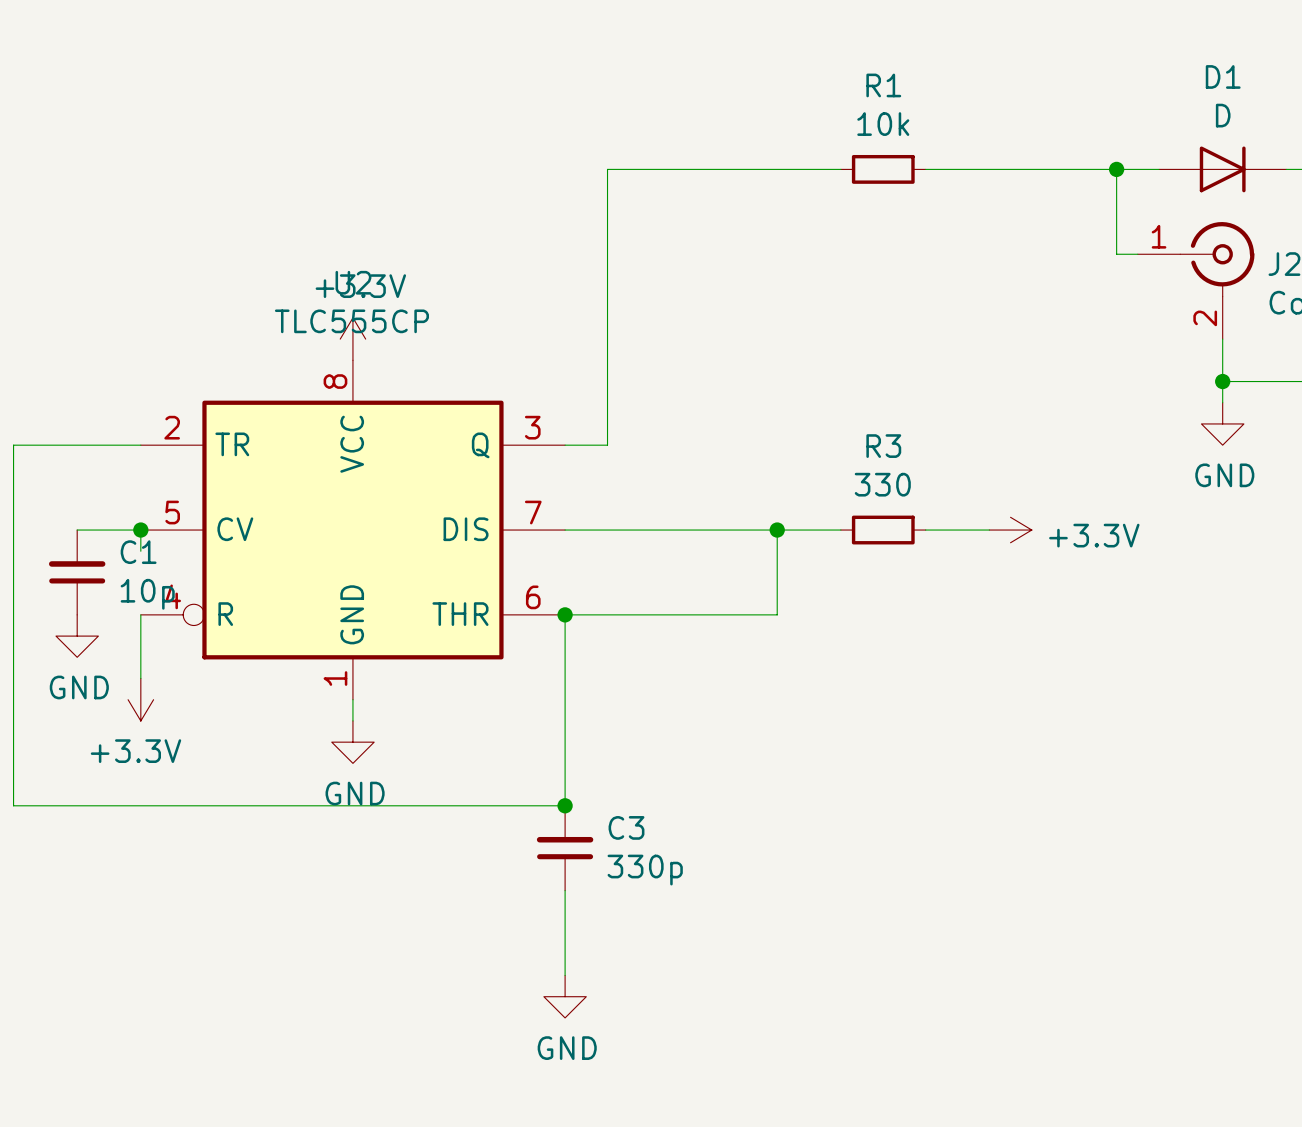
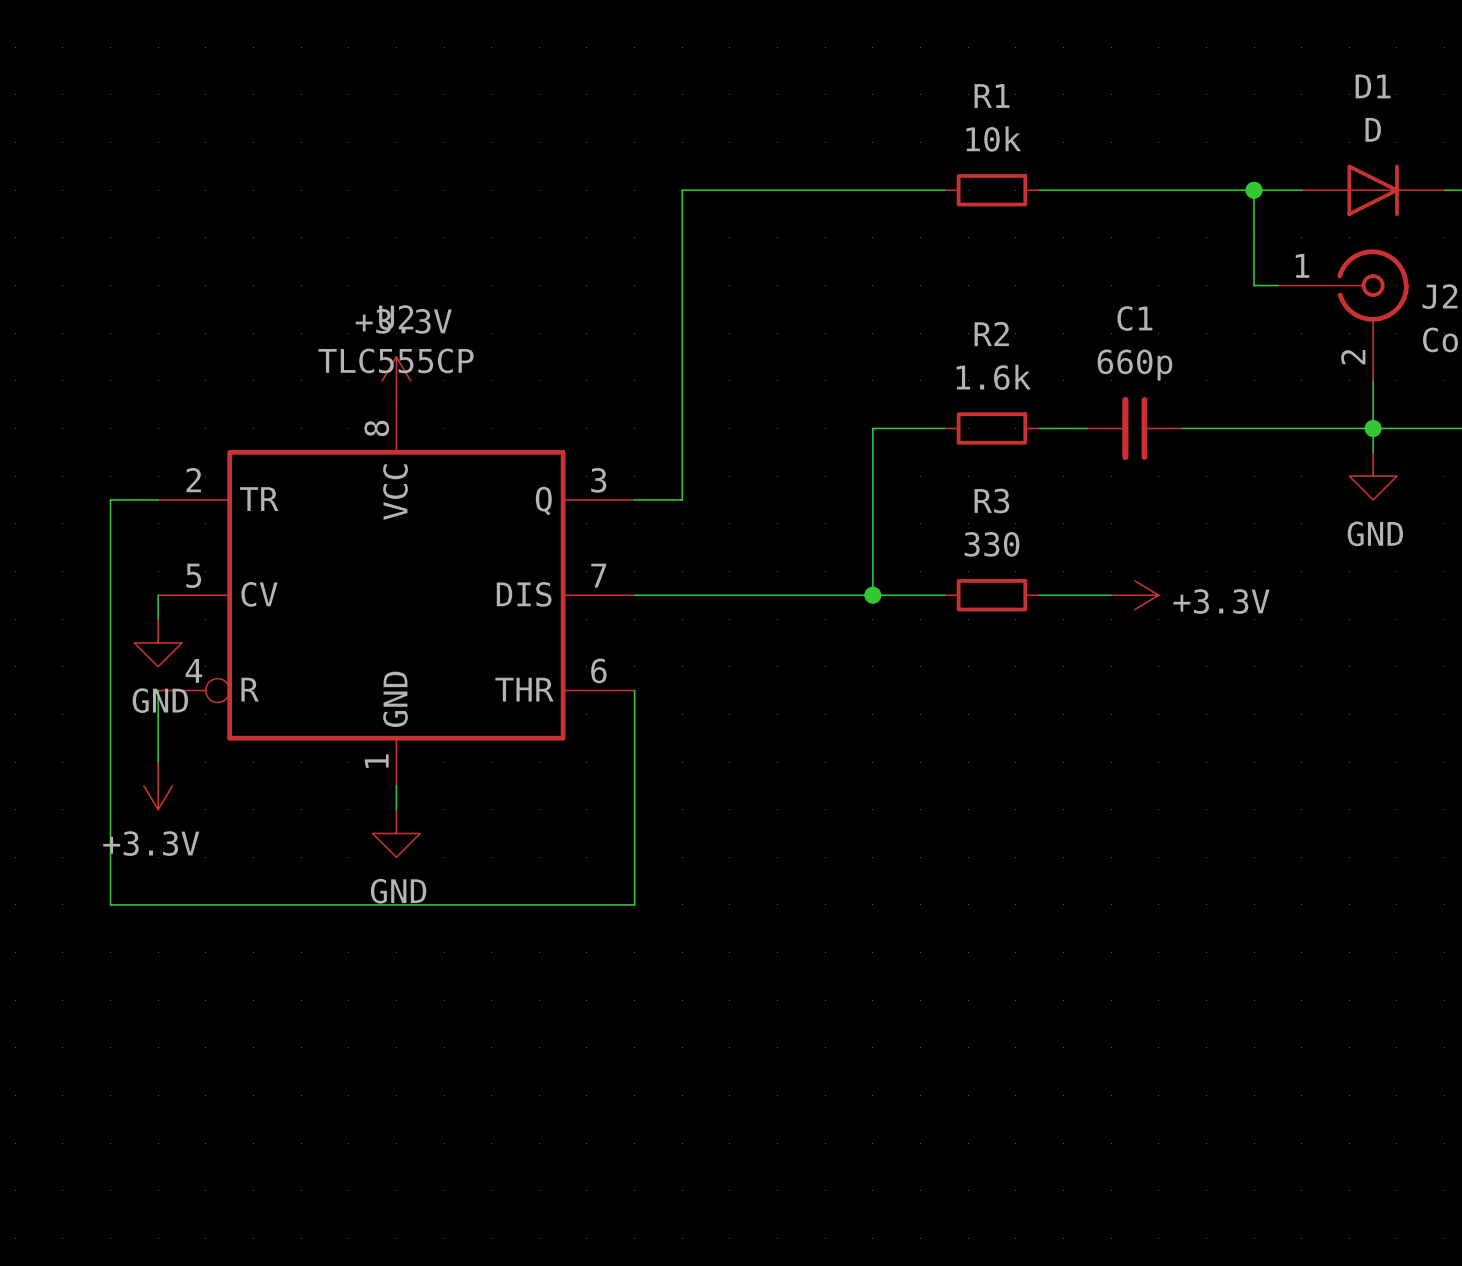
R2: none -> 1.6k (991, 428)
wire: none -> (1039, 428) (1087, 428)
wire: none -> (1182, 428) (1373, 428)
wire: (98, 445) (13, 445) (13, 805) (98, 805) -> (110, 499) (110, 904)
wire: (77, 530) (140, 530) -> none
junction: (140, 530) -> none
wire: (777, 530) (777, 614) (565, 614) -> (872, 595) (872, 428) (944, 428)
C1 name position: C1 (138, 552) -> C1 (1134, 318)
C1 rotation: 0° (77, 572) -> 90° counterclockwise (1134, 428)
C1 position: (77, 572) -> (1134, 428)
C1 value: 10p (147, 594) -> 660p (1134, 365)
junction: (565, 614) -> none
power symbol position: GND (77, 636) -> GND (158, 642)
junction: (565, 805) -> none
C3: 330p (565, 848) -> none
wire: (565, 890) (565, 975) -> none
power symbol: GND (565, 996) -> none

